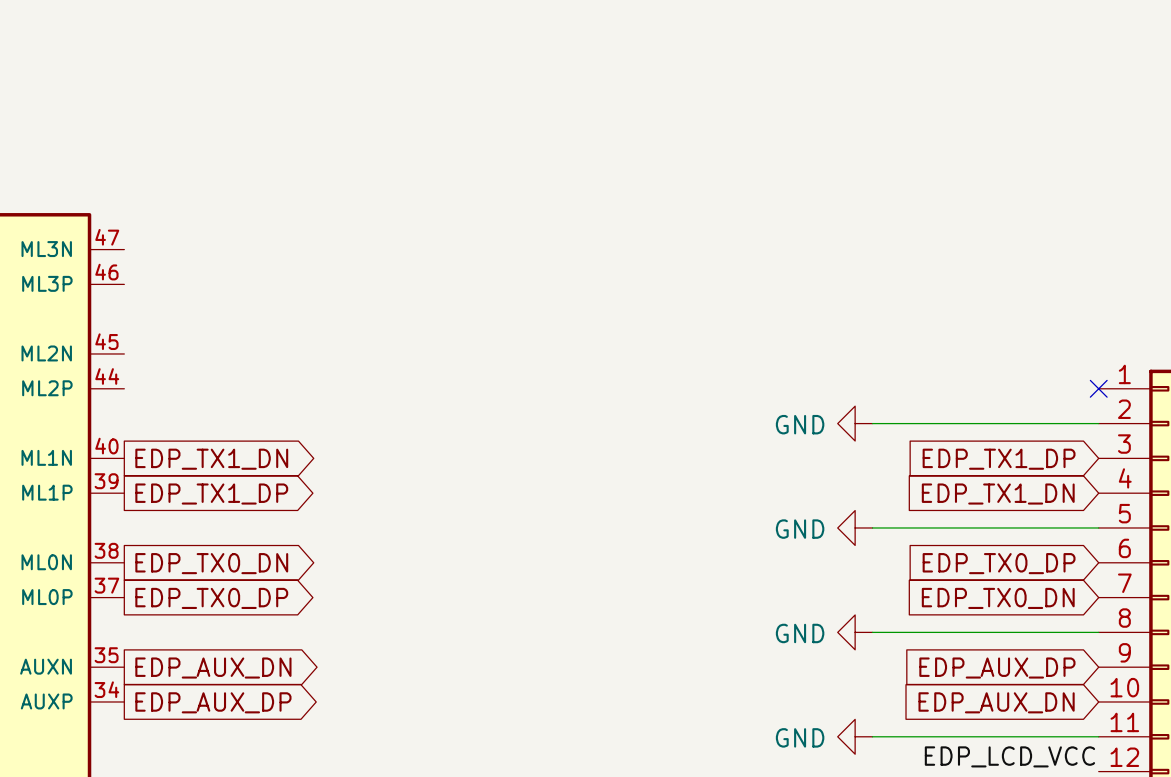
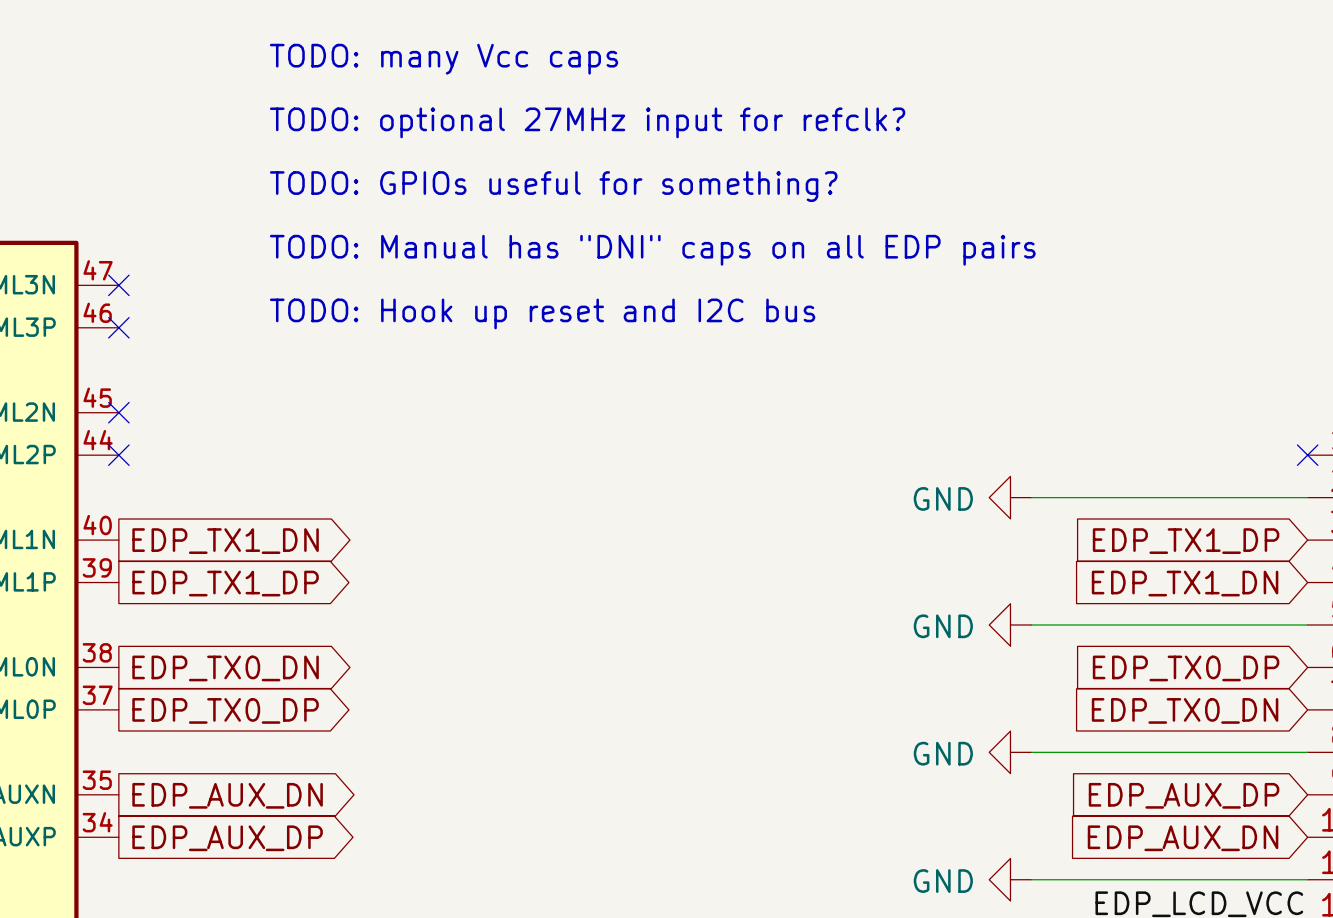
text: none -> TODO: many Vcc caps (444, 59)
text: none -> TODO: optional 27MHz input for refclk? (587, 122)
text: none -> TODO: GPIOs useful for something? (553, 186)
text: none -> TODO: Manual has "DNI" caps on all EDP pairs (652, 250)
no-connect mark: none -> (118, 285)
text: none -> TODO: Hook up reset and I2C bus (542, 313)
no-connect mark: none -> (118, 327)
no-connect mark: none -> (118, 412)
no-connect mark: none -> (118, 455)

